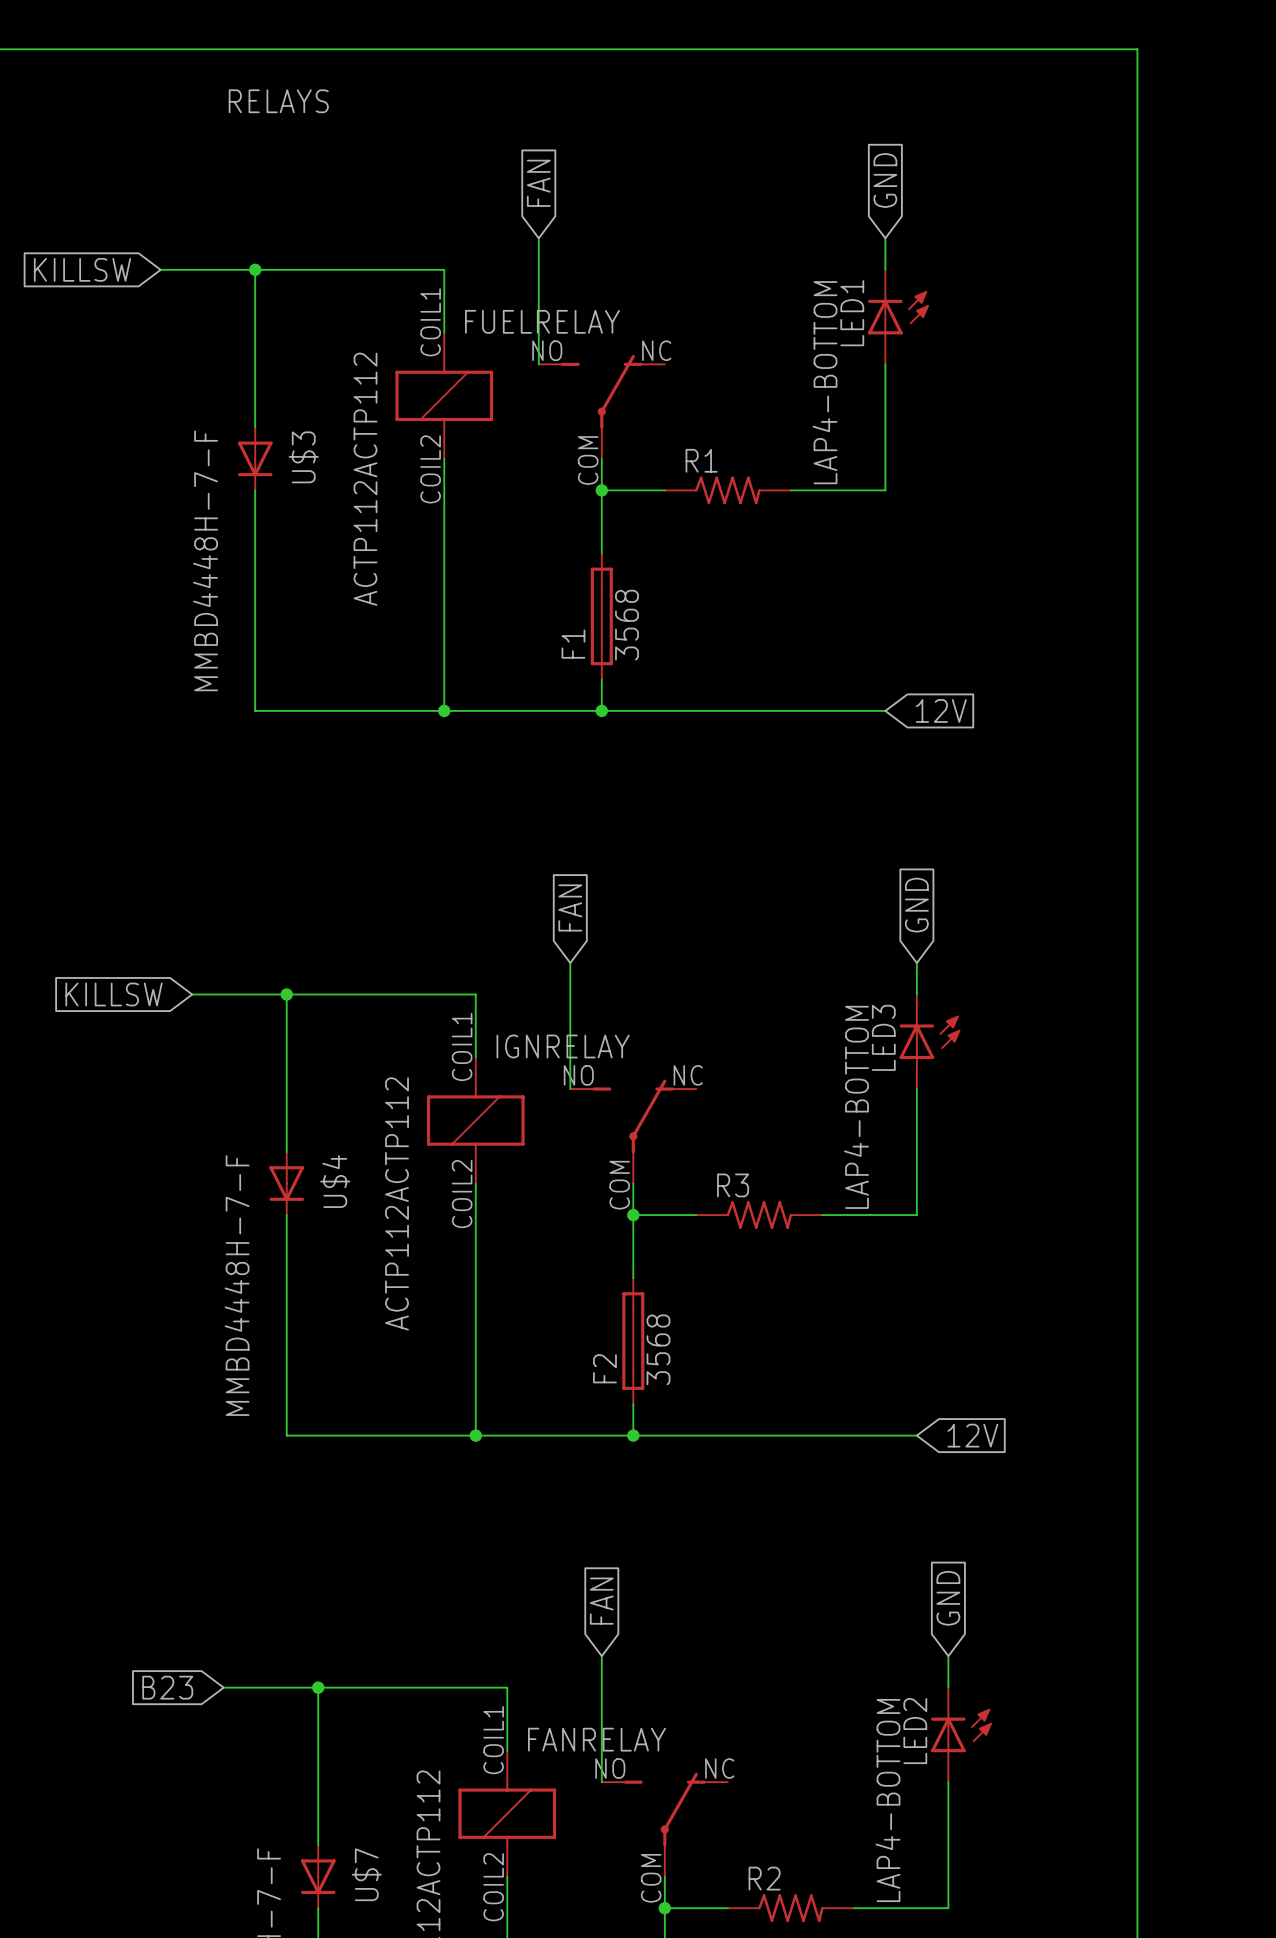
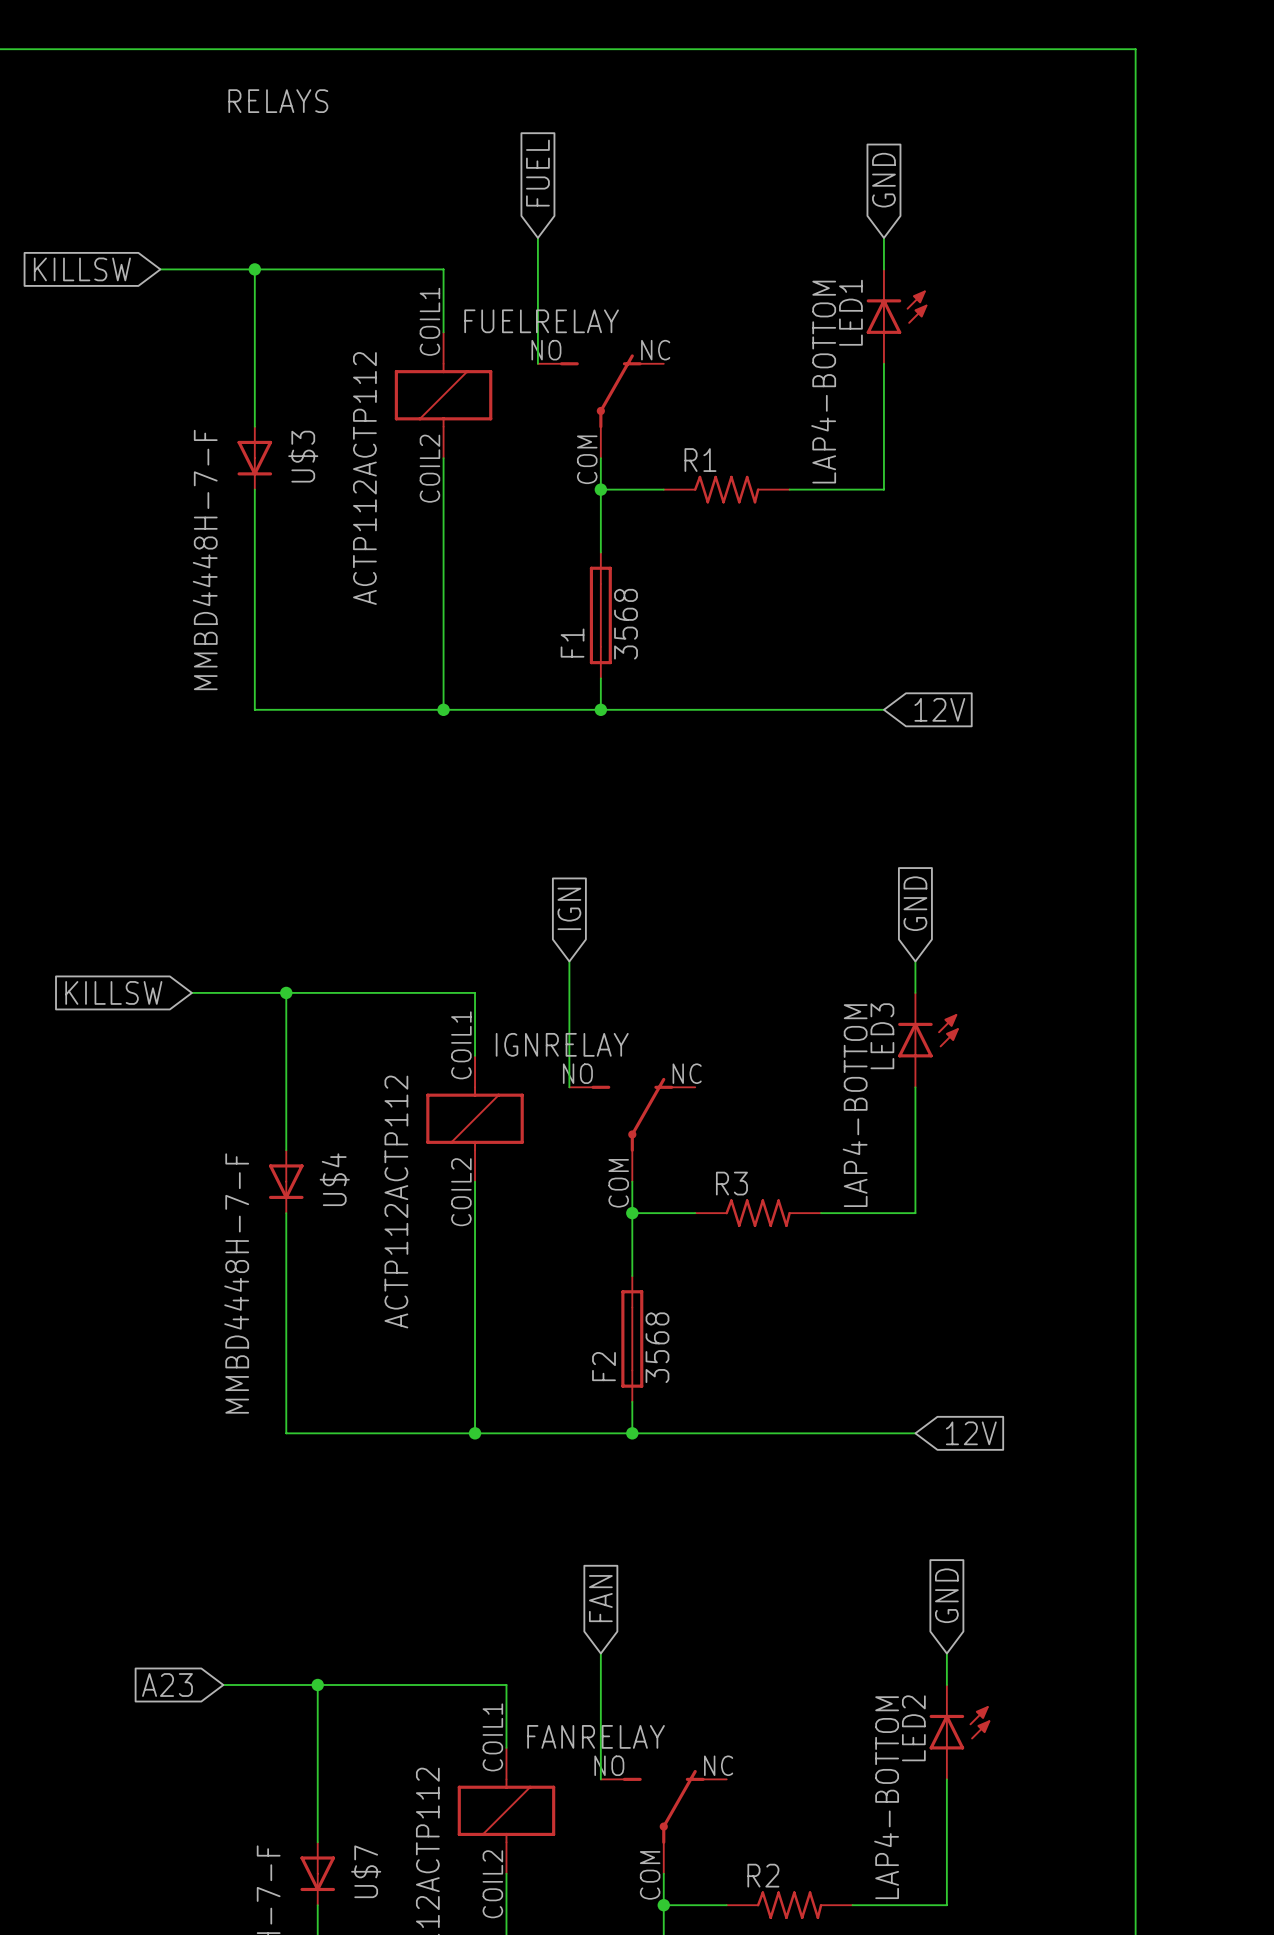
global label: FAN (538, 183) -> FUEL (537, 173)
global label: FAN (570, 907) -> IGN (569, 908)
global label: B23 (167, 1687) -> A23 (167, 1685)

